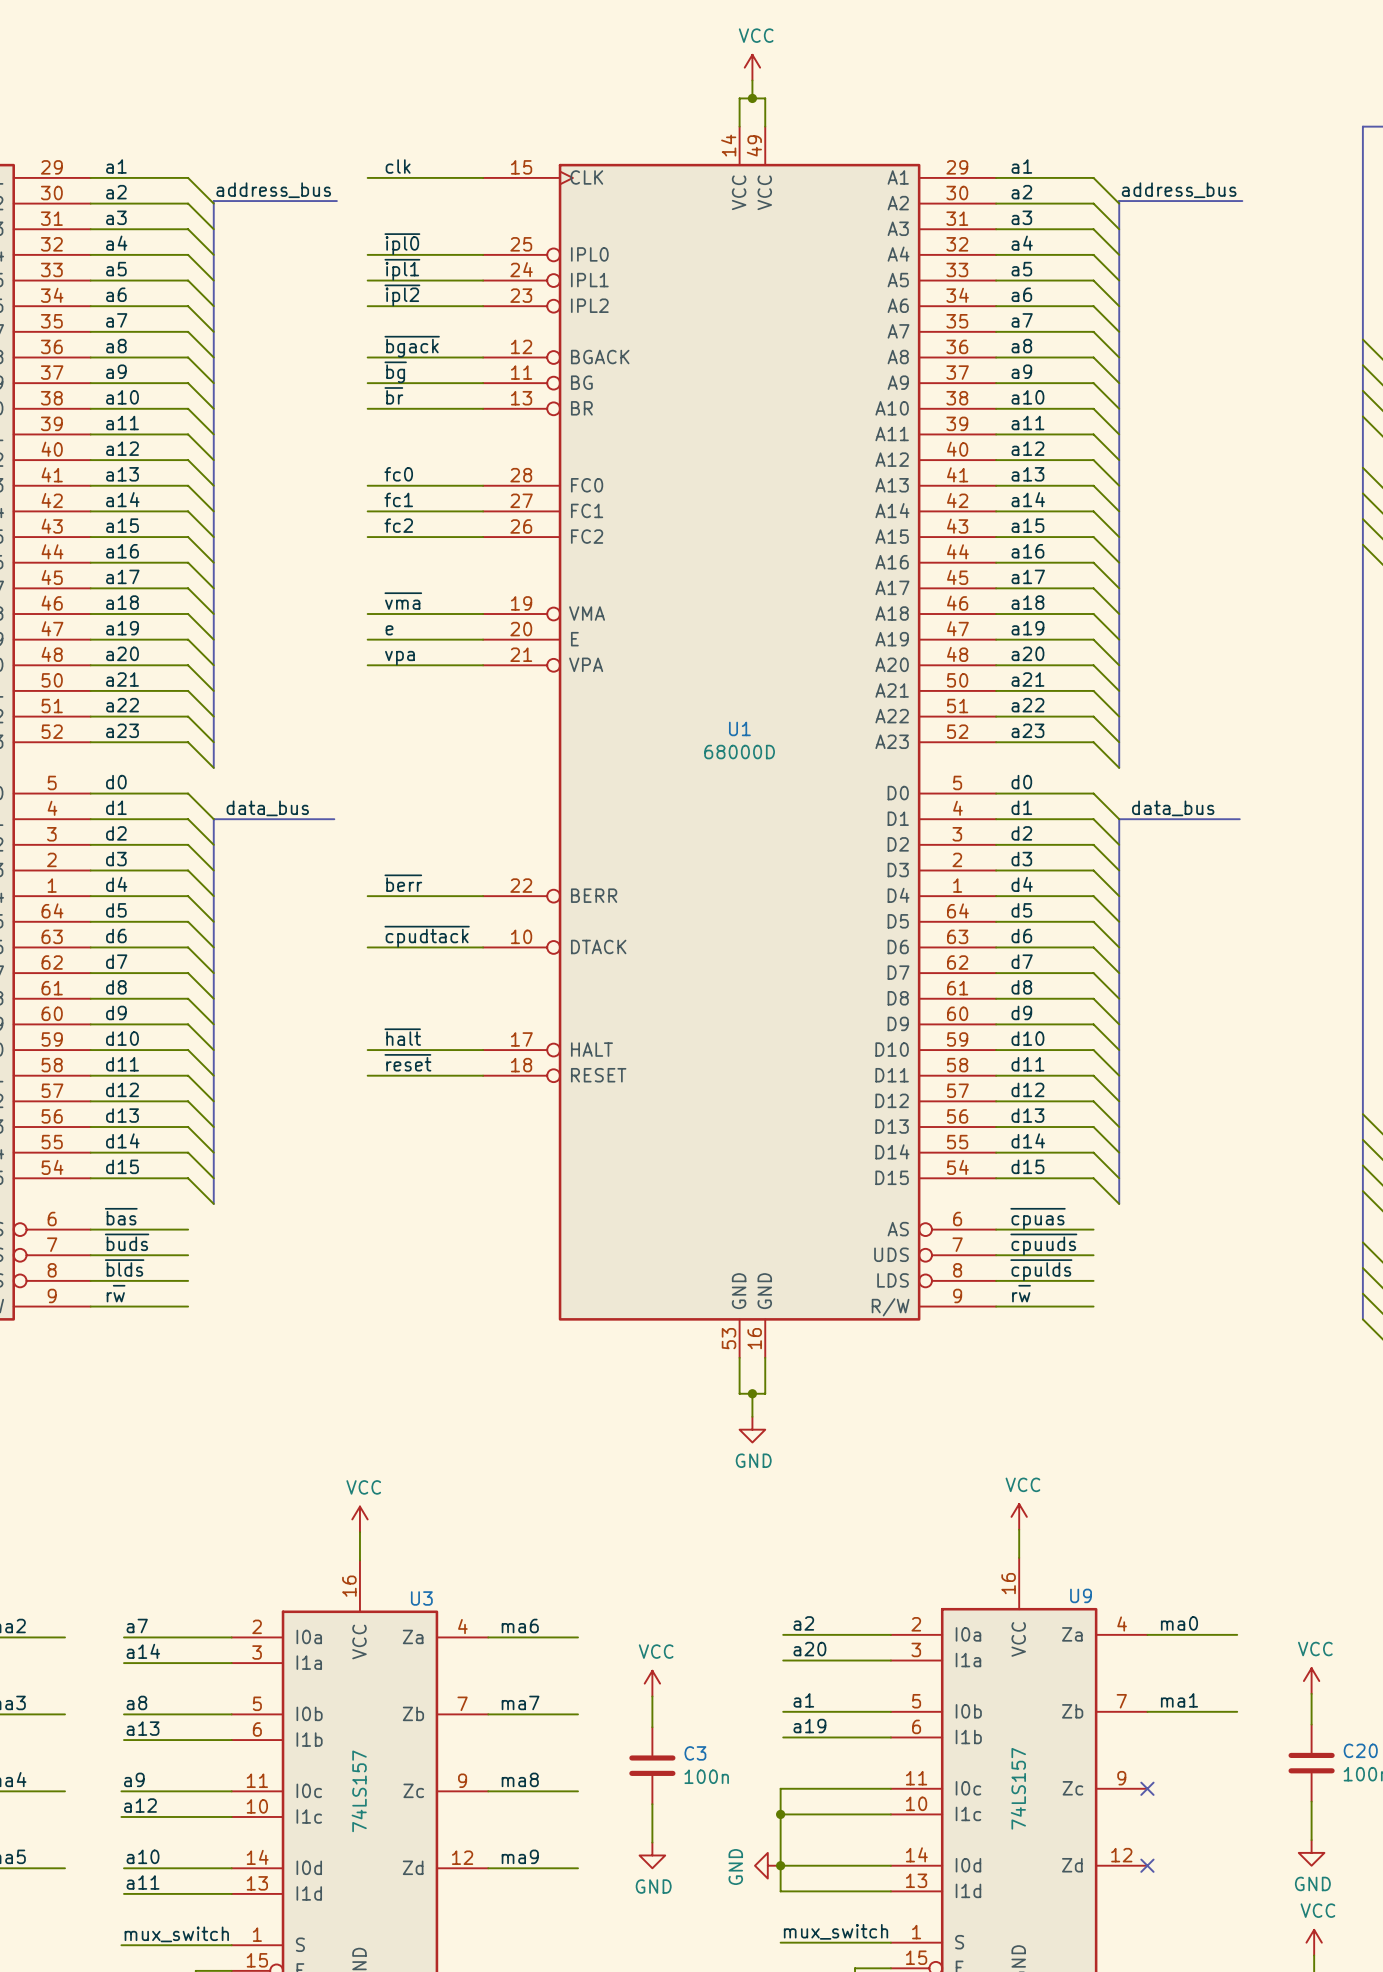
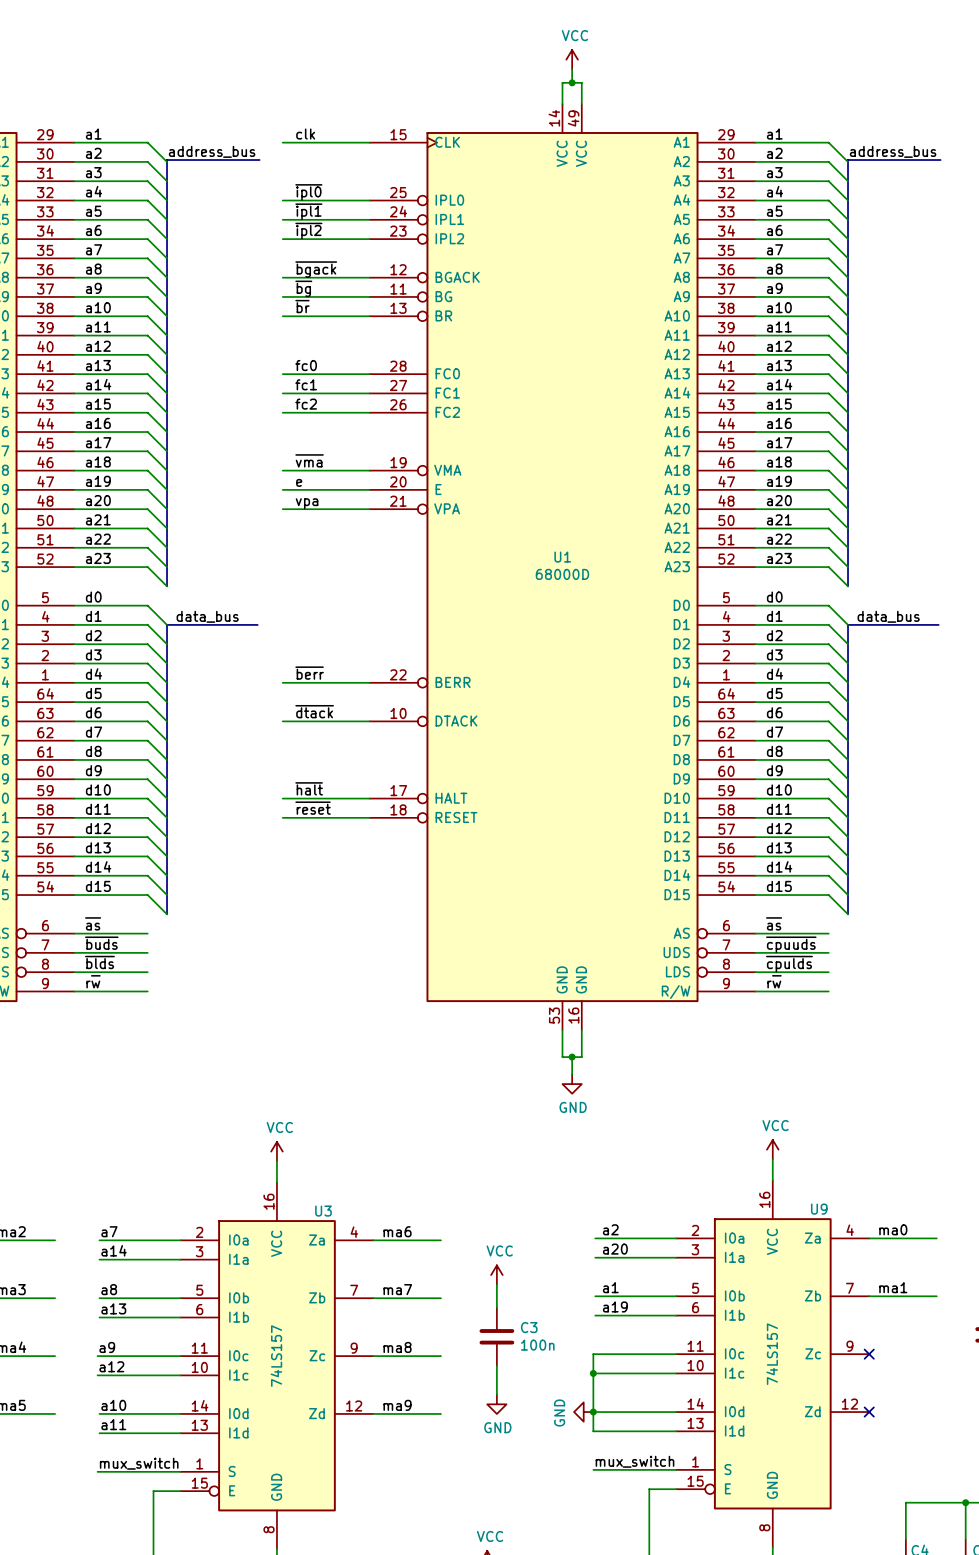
label: ~{cpudtack} (427, 936) -> ~{dtack} (314, 711)
label: ~{bas} (121, 1216) -> ~{as} (93, 923)
label: ~{cpuas} (1038, 1218) -> ~{as} (774, 923)

